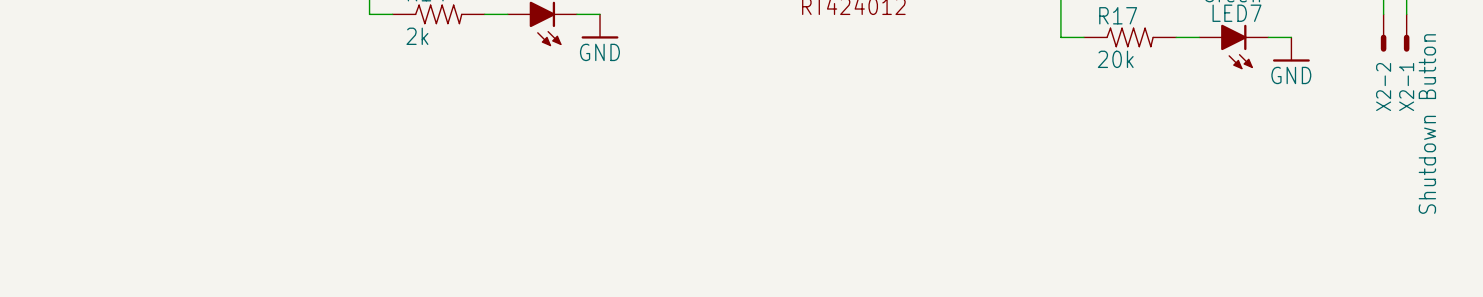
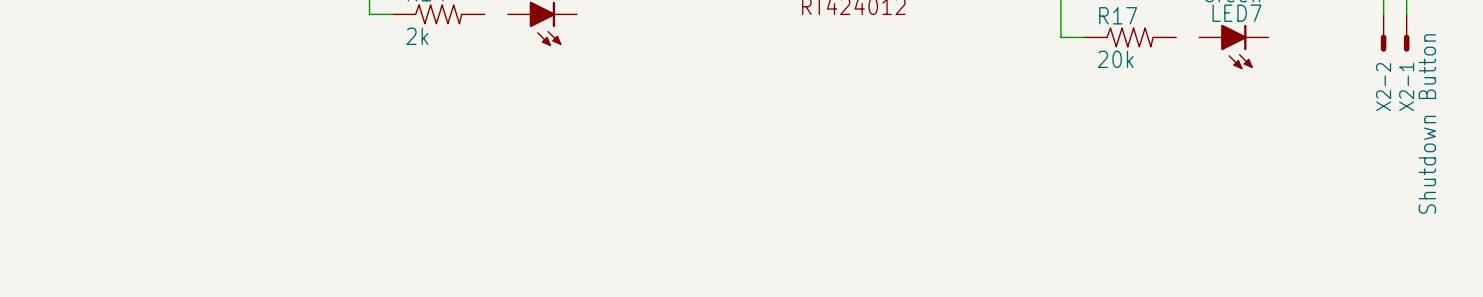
wire: (484, 14) (507, 14) -> none
wire: (576, 14) (600, 14) -> none
power symbol: GND (600, 26) -> none
wire: (1176, 37) (1199, 37) -> none
wire: (1268, 37) (1291, 37) -> none
power symbol: GND (1291, 49) -> none

